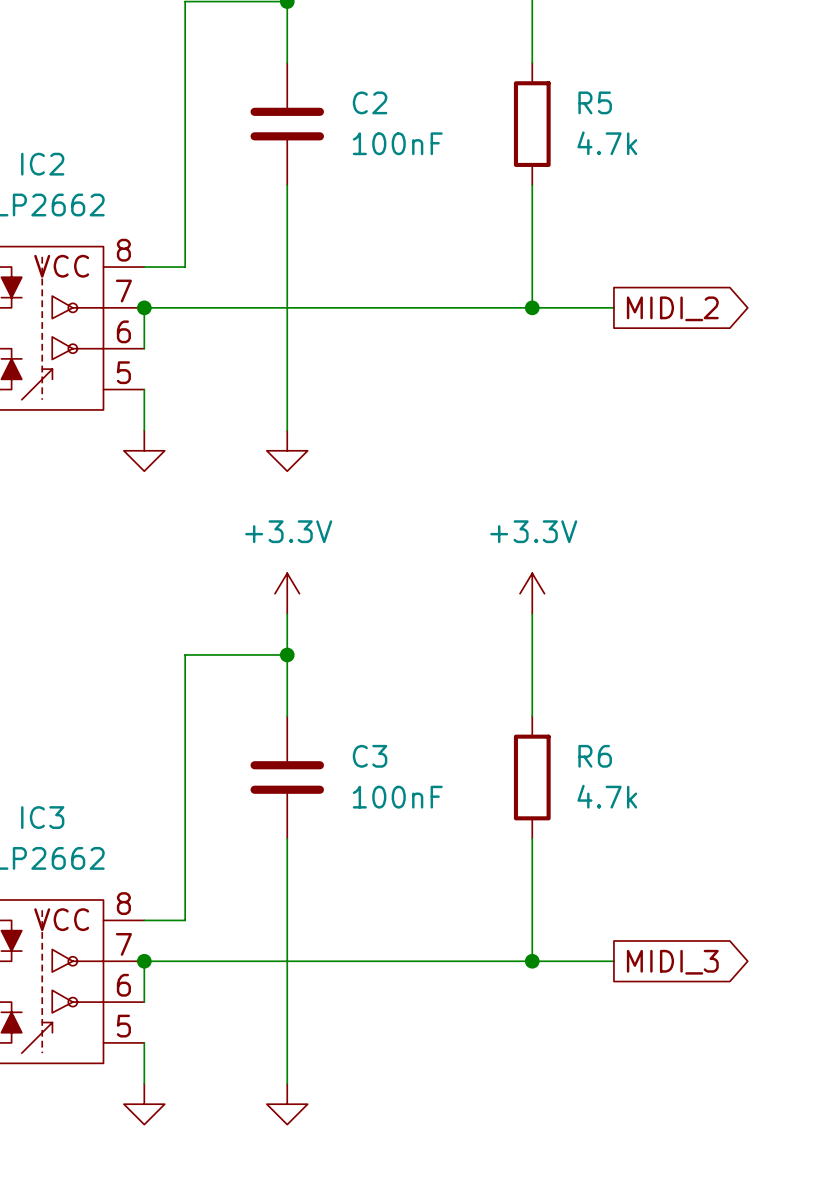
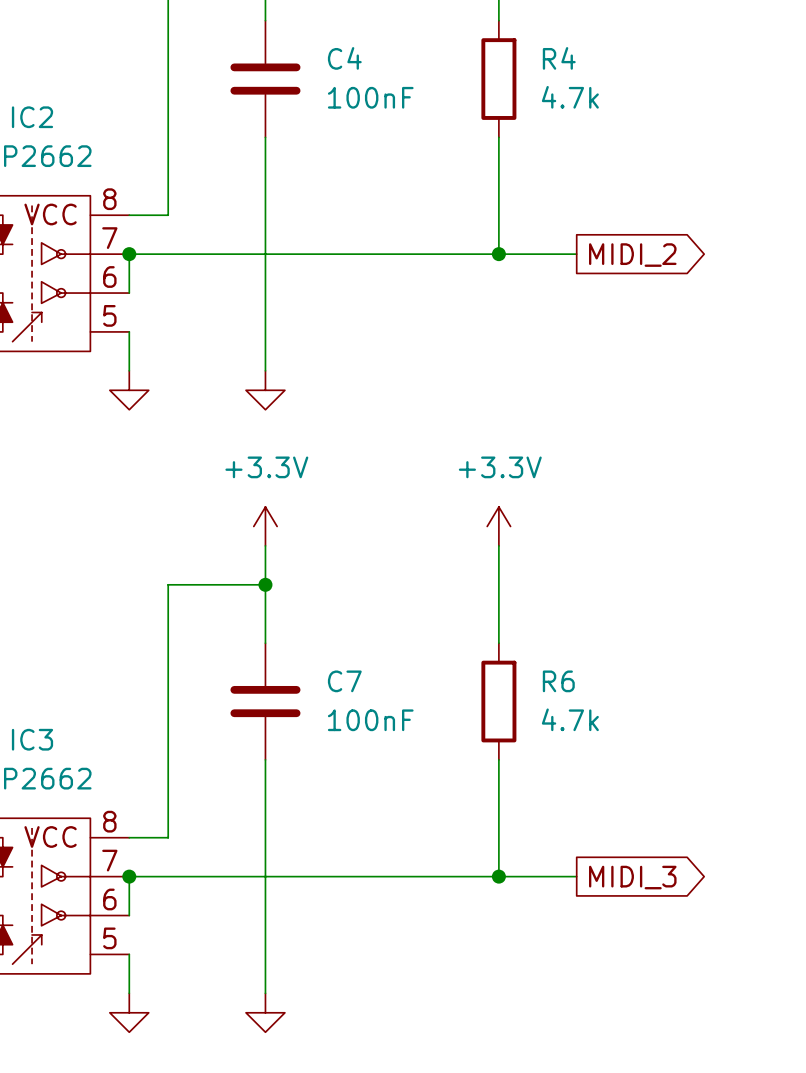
C2 name: C2 (370, 102) -> C4 (344, 58)
R5 name: R5 (595, 102) -> R4 (559, 58)
C3 name: C3 (370, 756) -> C7 (344, 681)

